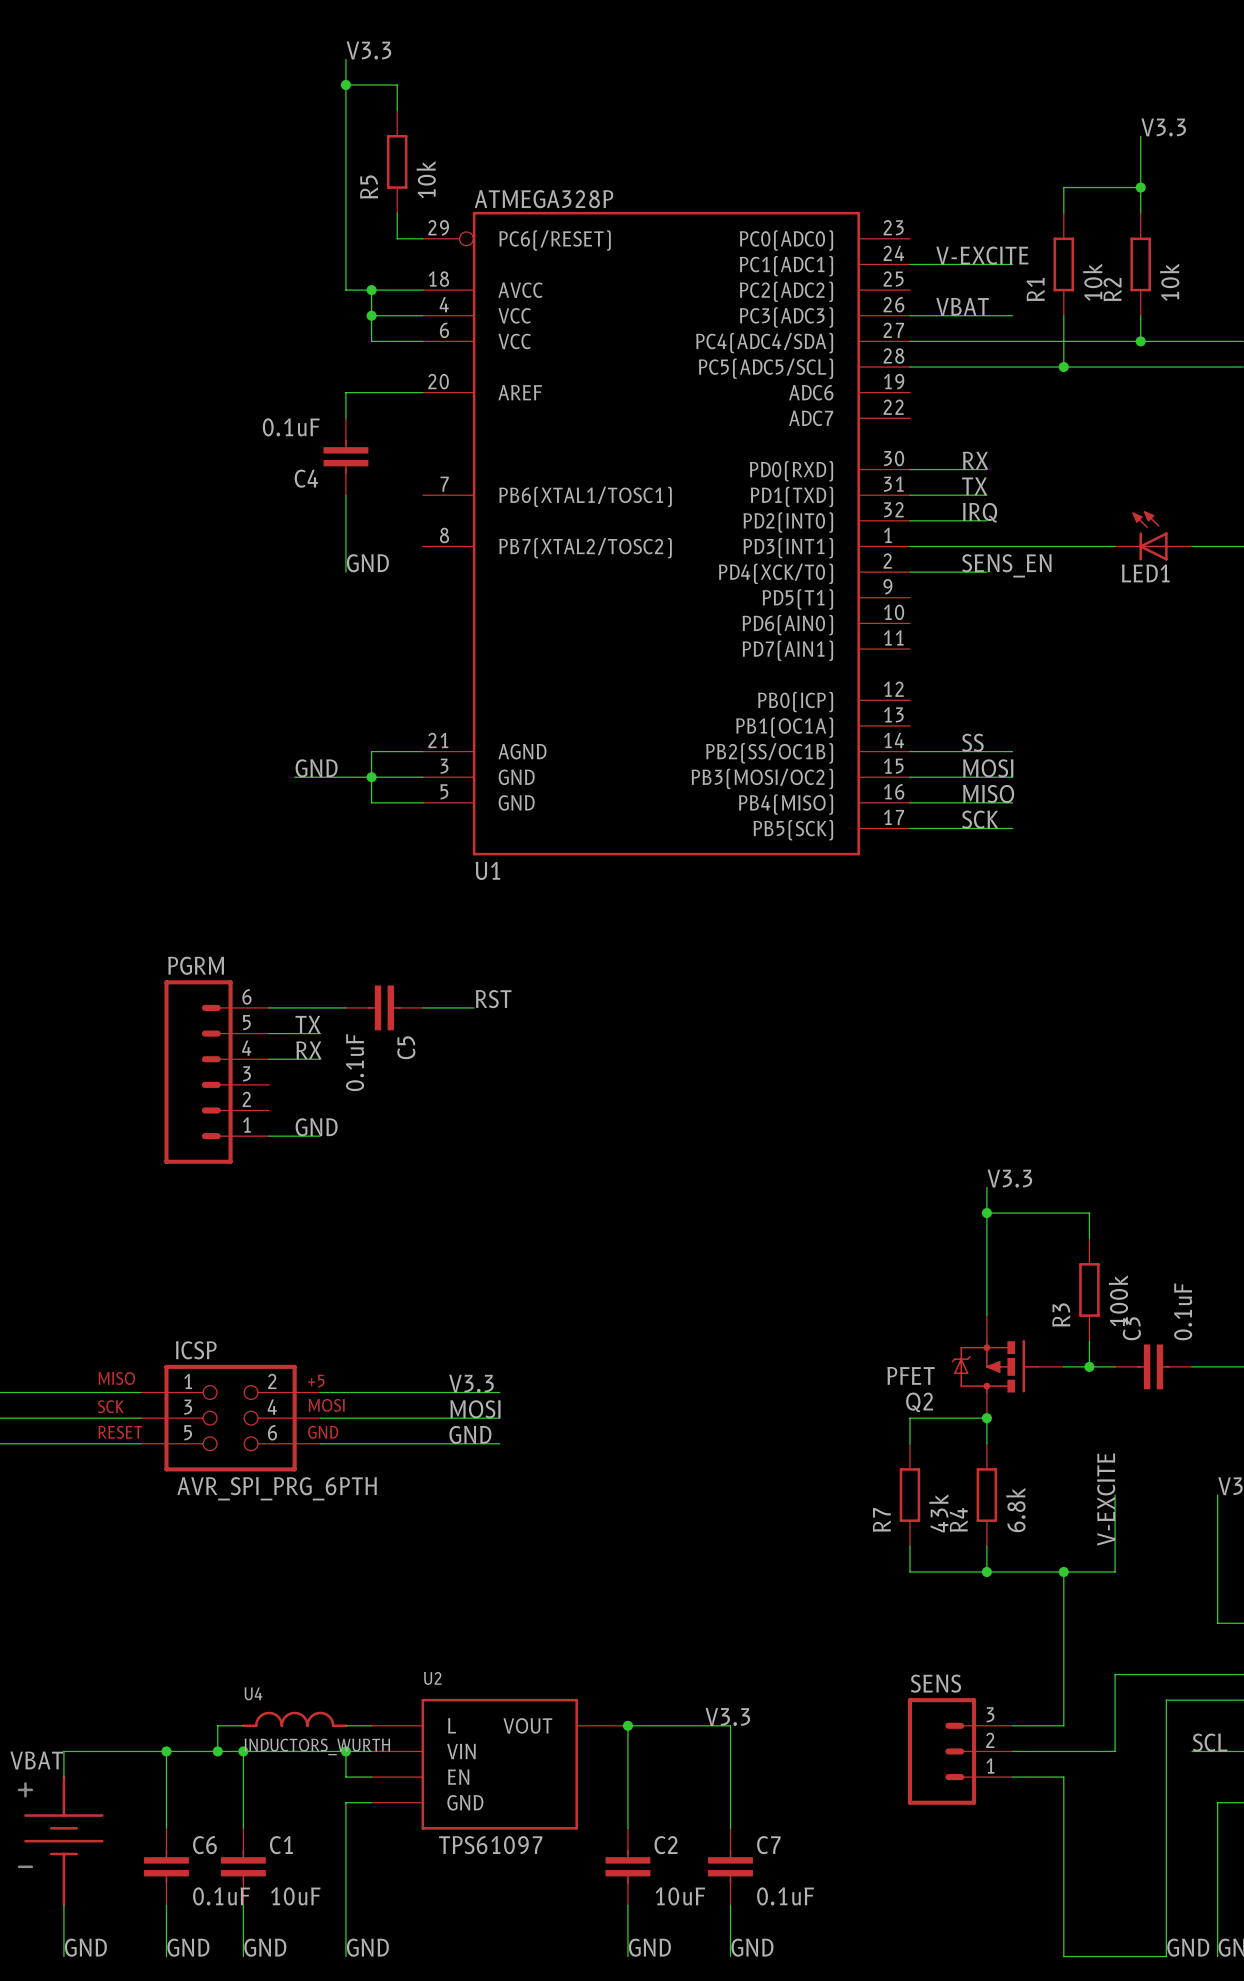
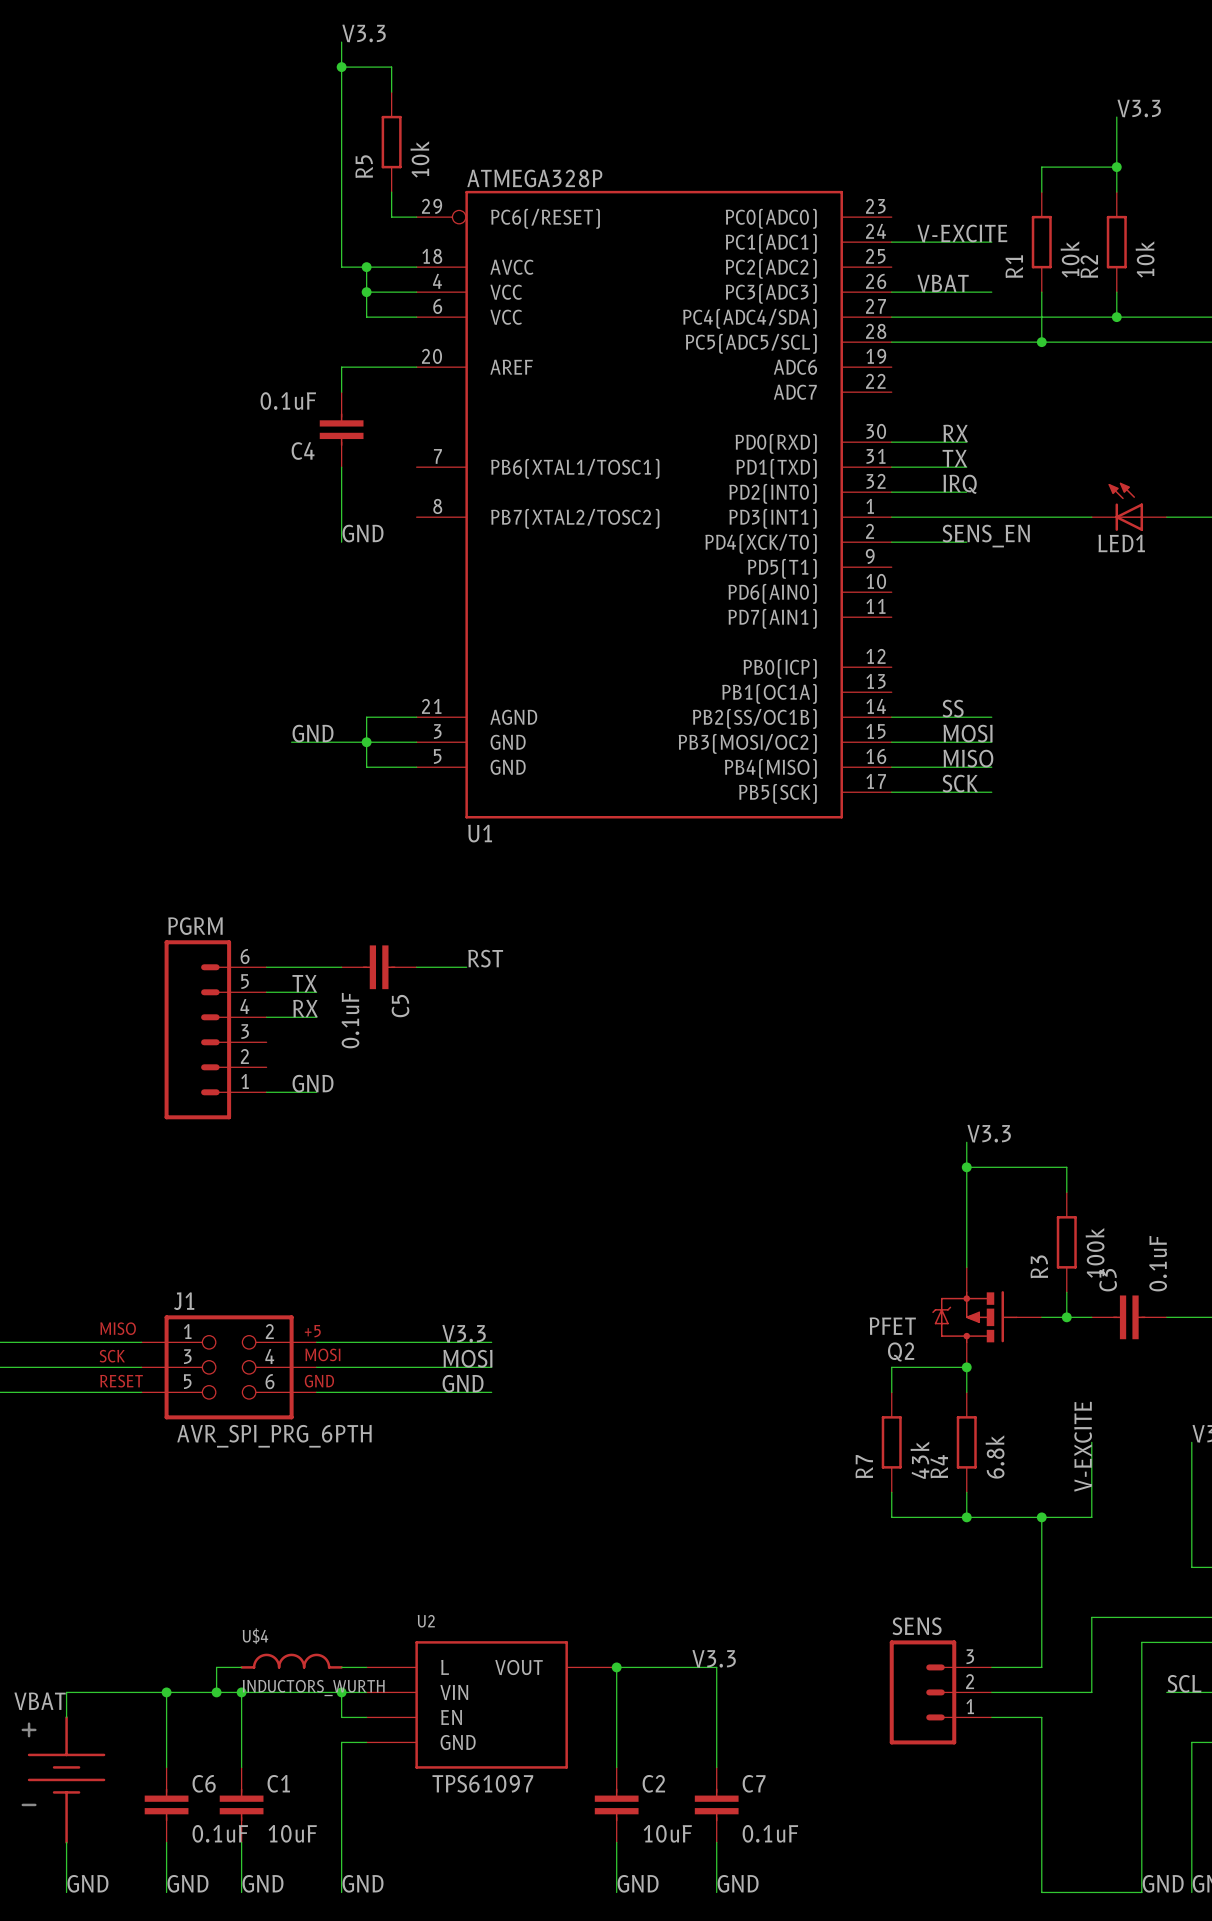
ICSP name: ICSP (196, 1350) -> J1 (184, 1301)
U4 name: U4 (253, 1693) -> U$4 (255, 1636)

